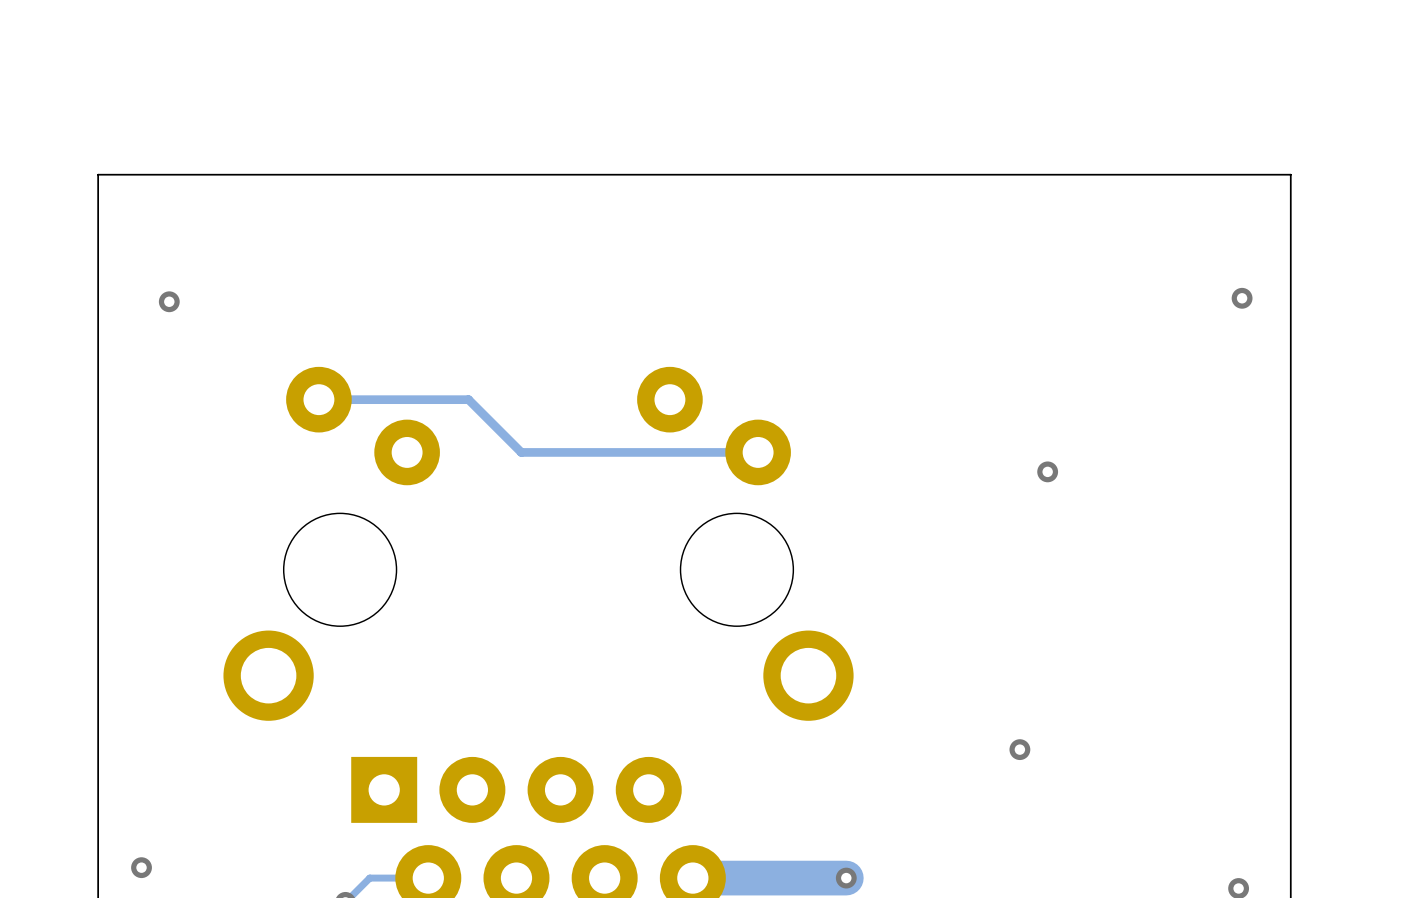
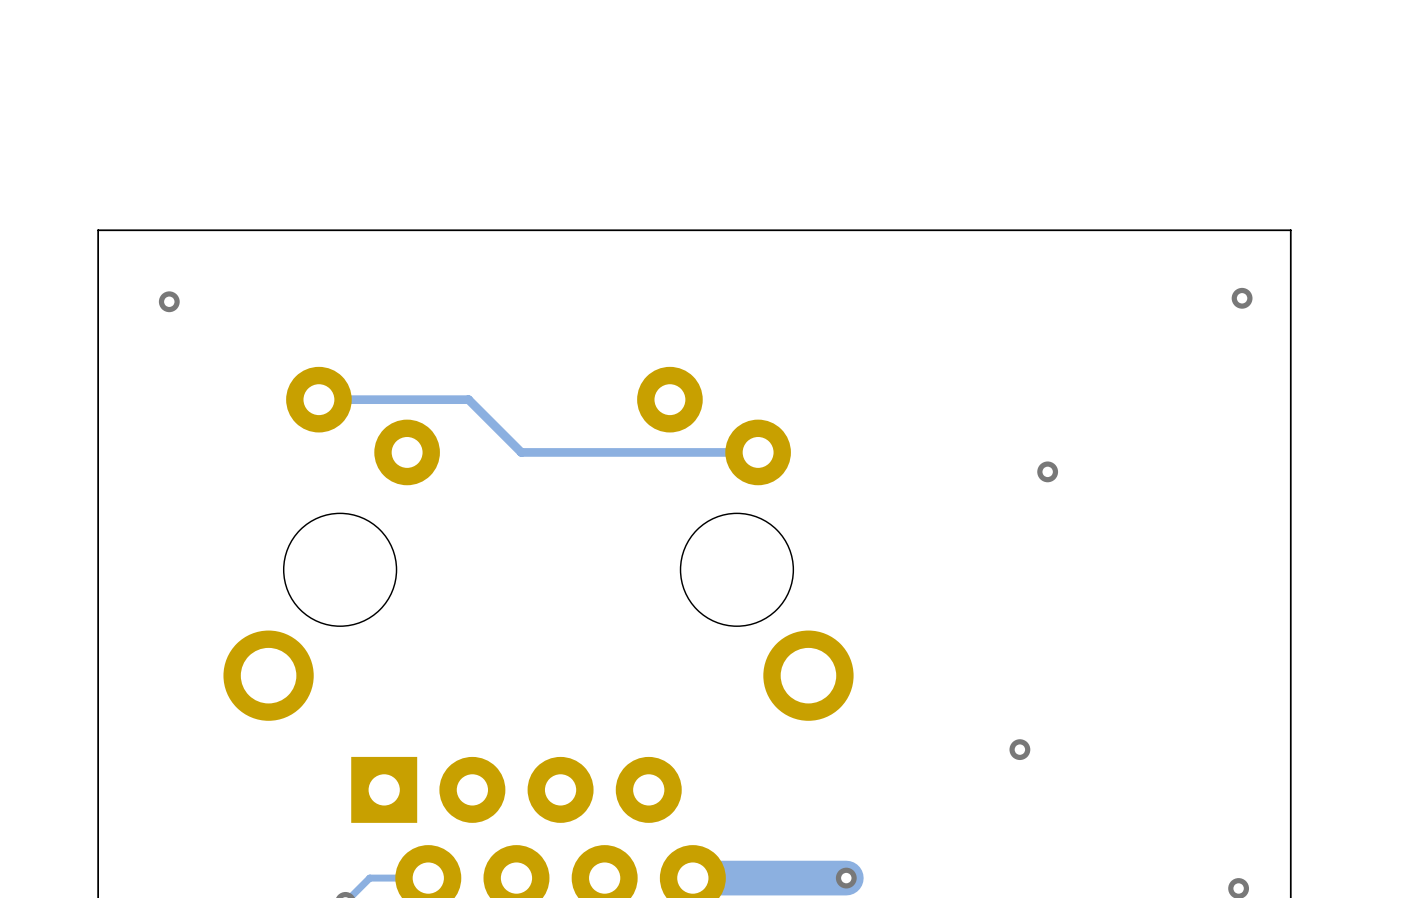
board edge: (1290, 230) (1290, 174) (98, 174) (98, 230) -> (1290, 230) (98, 230)
via: (141, 867) -> none

